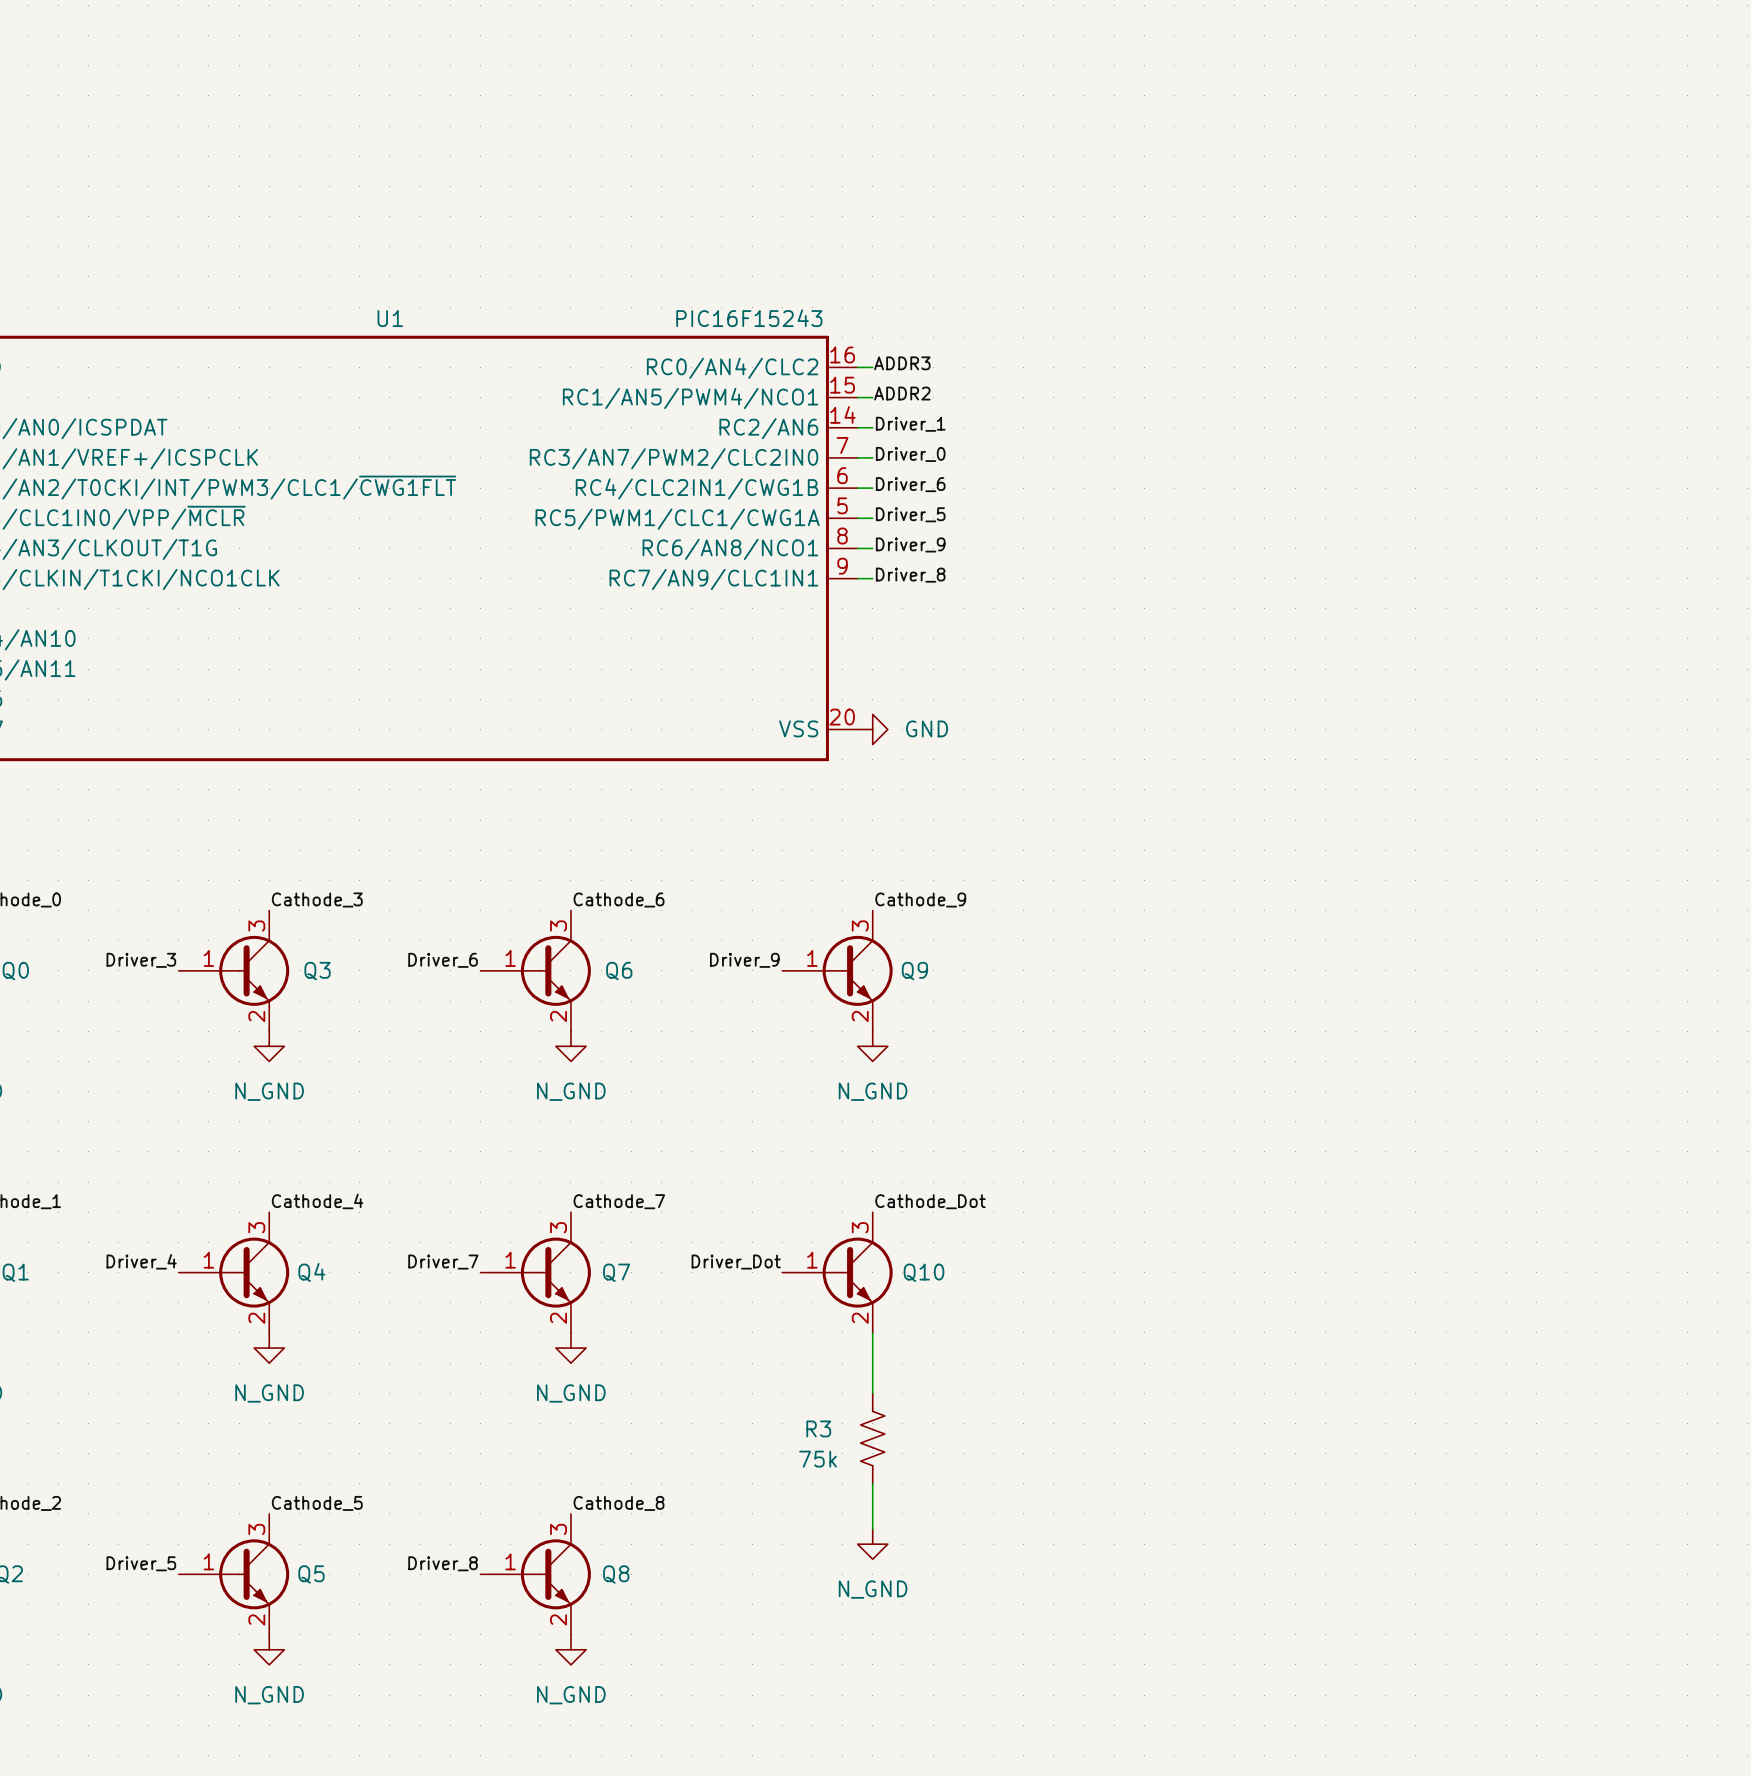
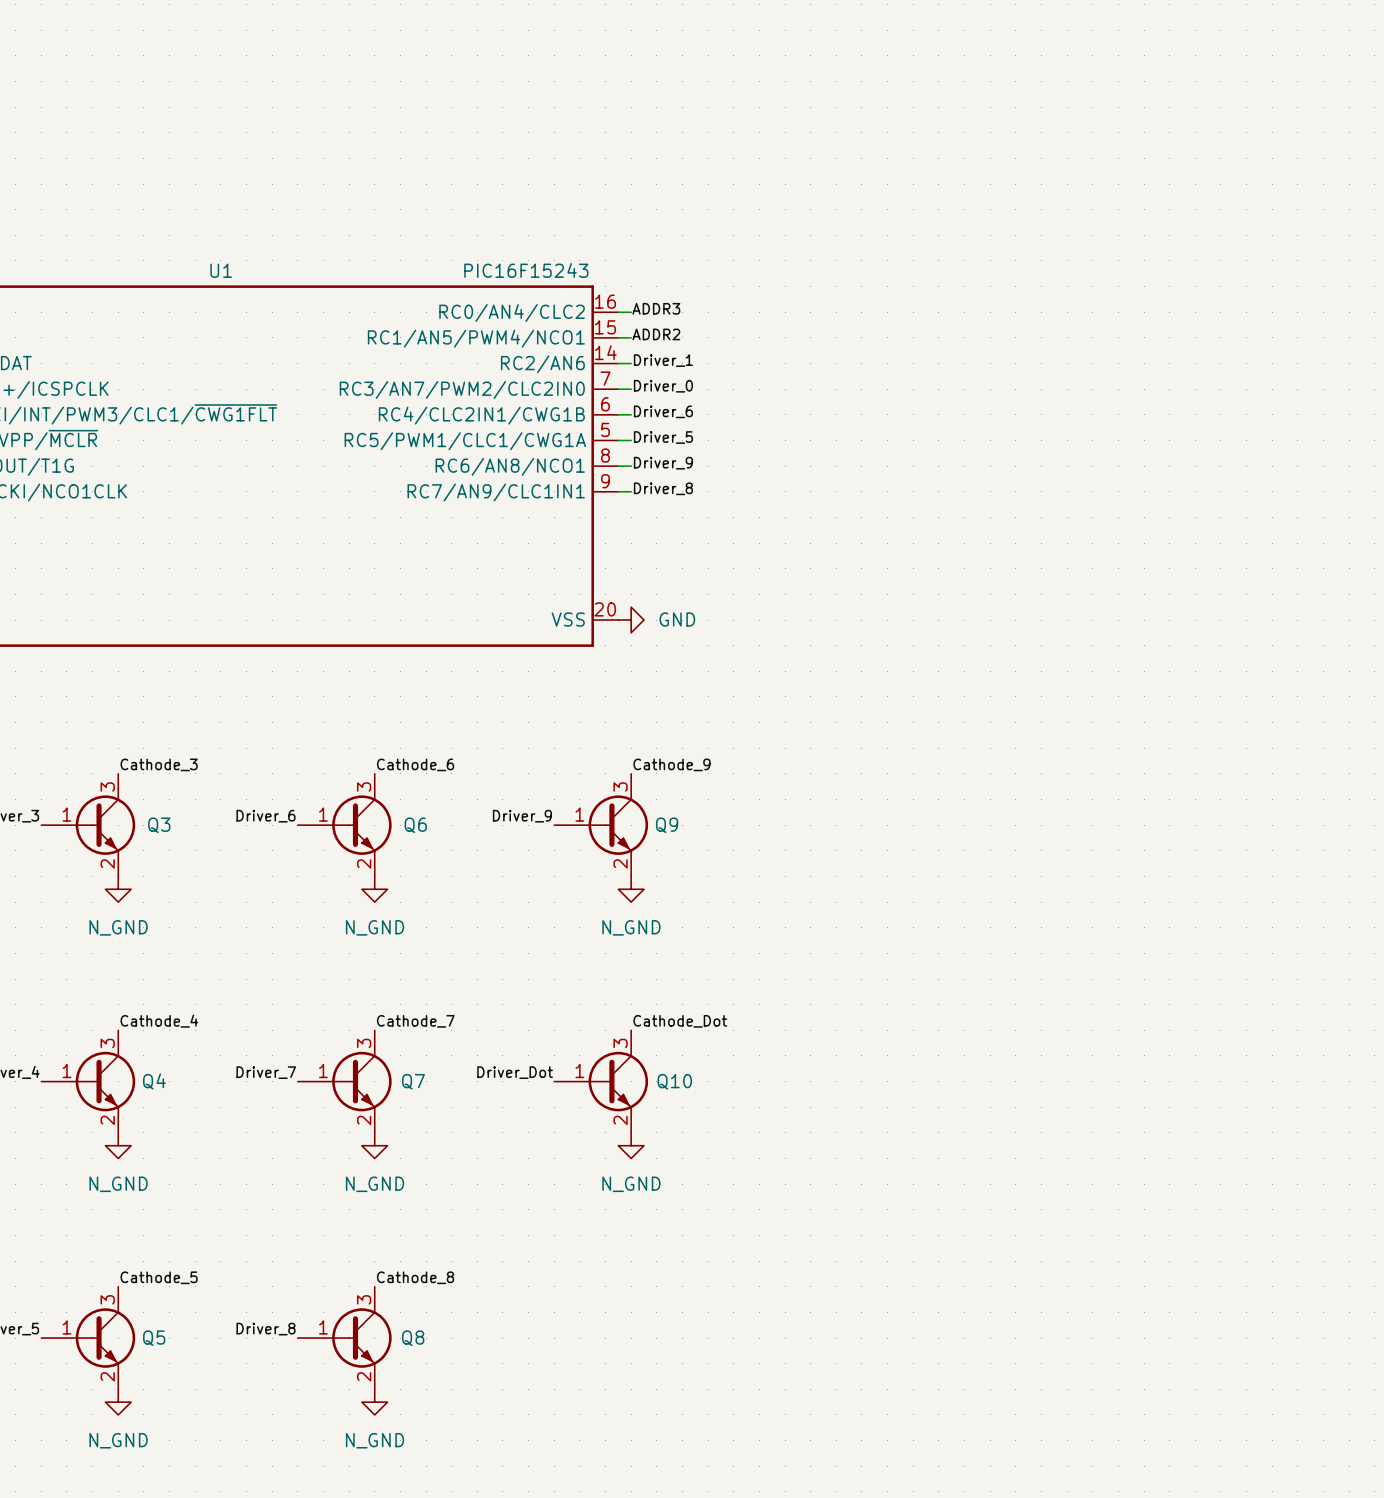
wire: (872, 1332) (872, 1393) -> none
R3: 75k (872, 1438) -> none
wire: (872, 1483) (872, 1529) -> none
power symbol position: N_GND (872, 1544) -> N_GND (631, 1145)

